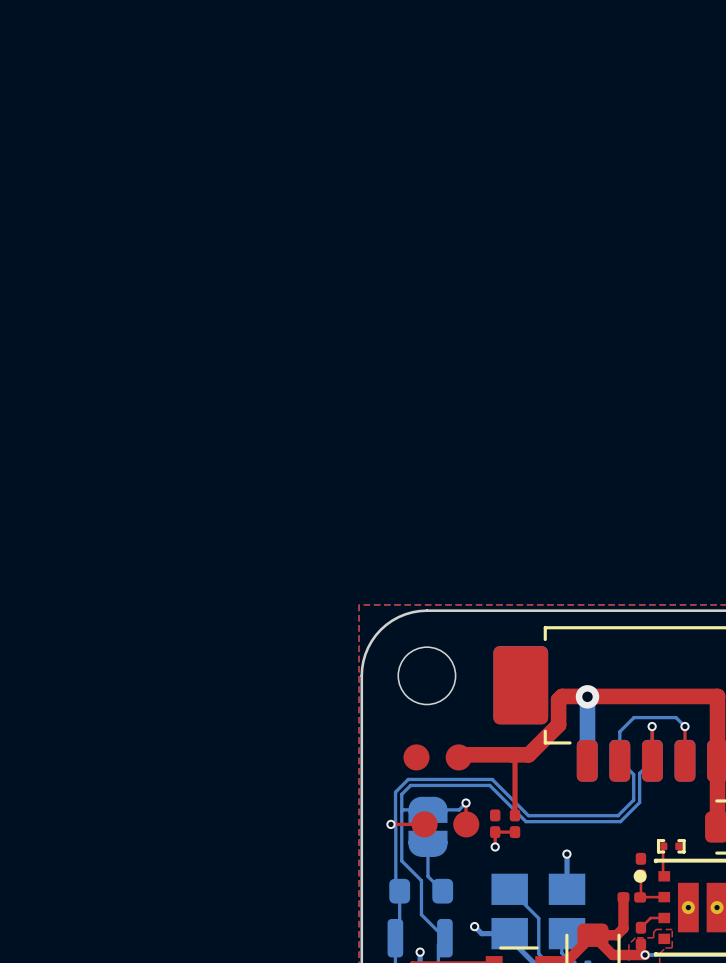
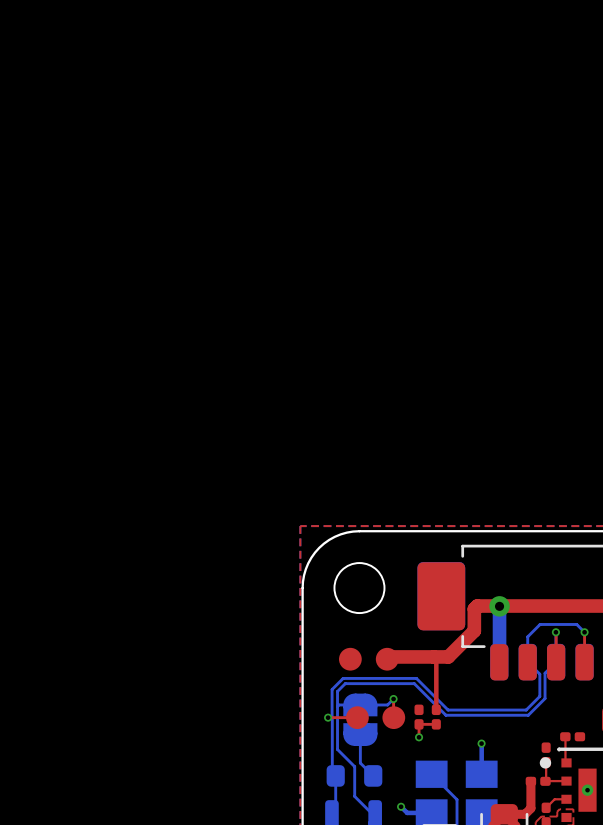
part footprint: [656, 839, 686, 854] -> [560, 732, 586, 742]

